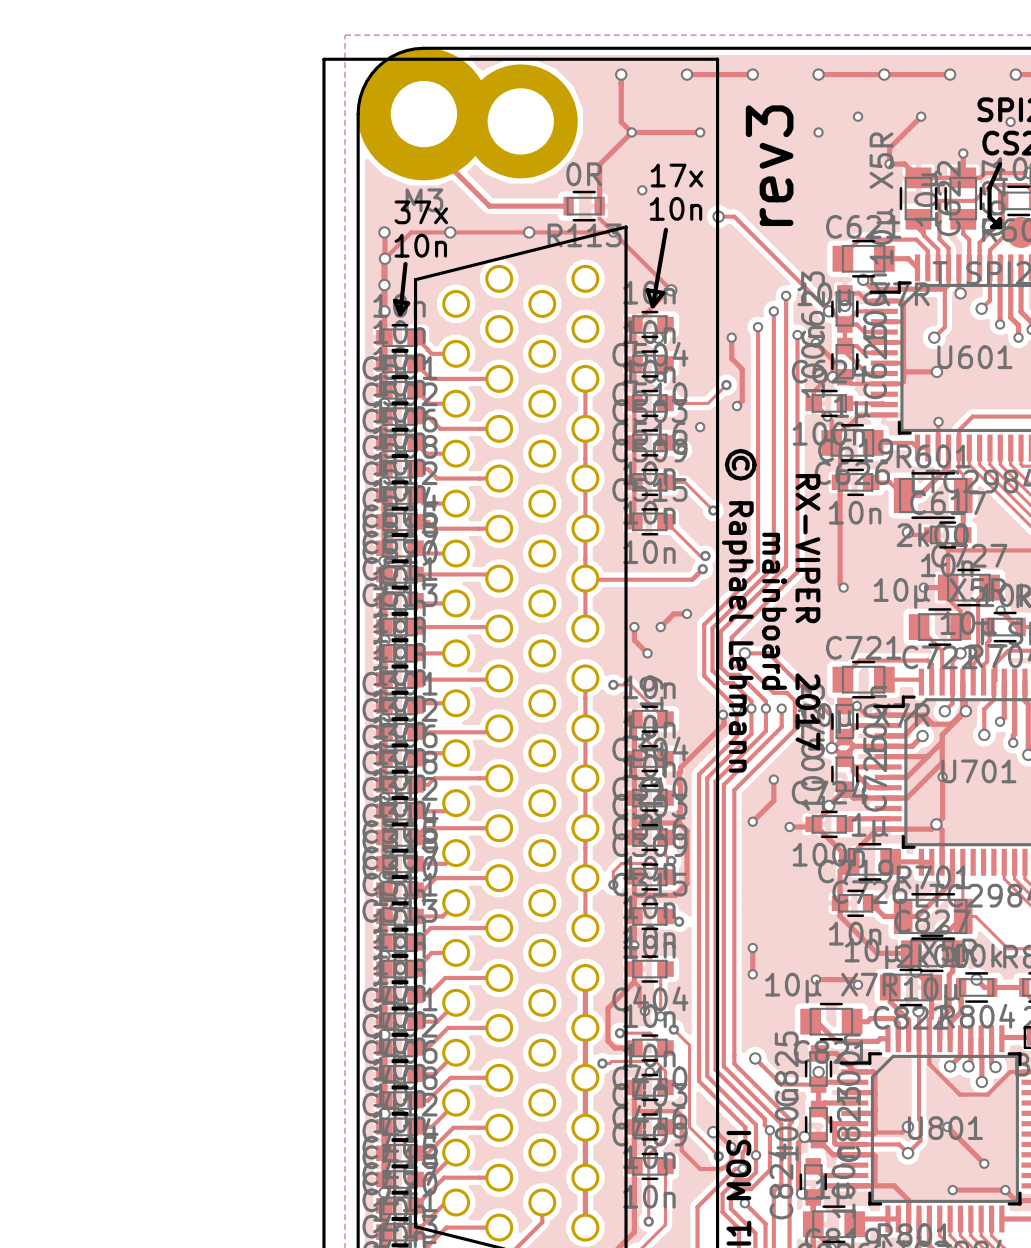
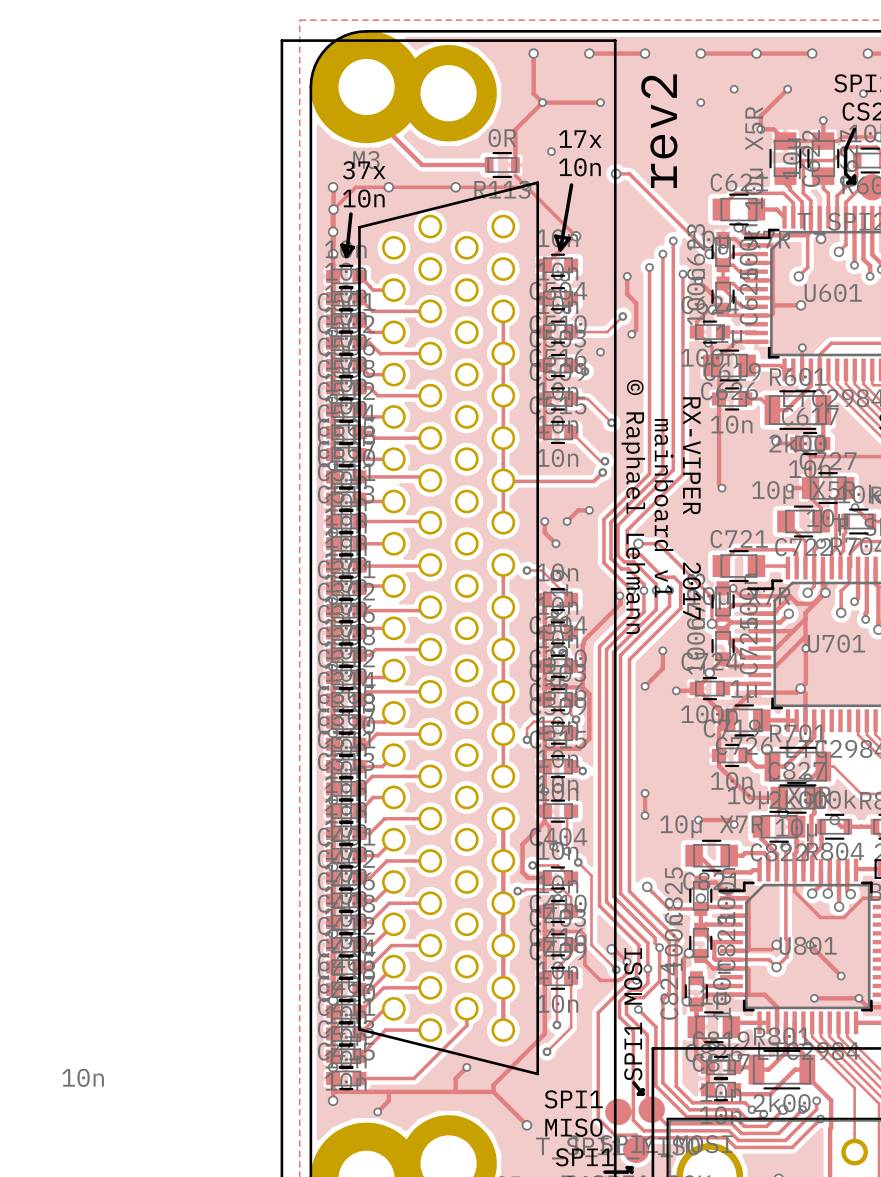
text: rev3 (769, 165) -> rev2 (659, 131)
text: mainboard (774, 611) -> mainboard v1 (664, 508)

